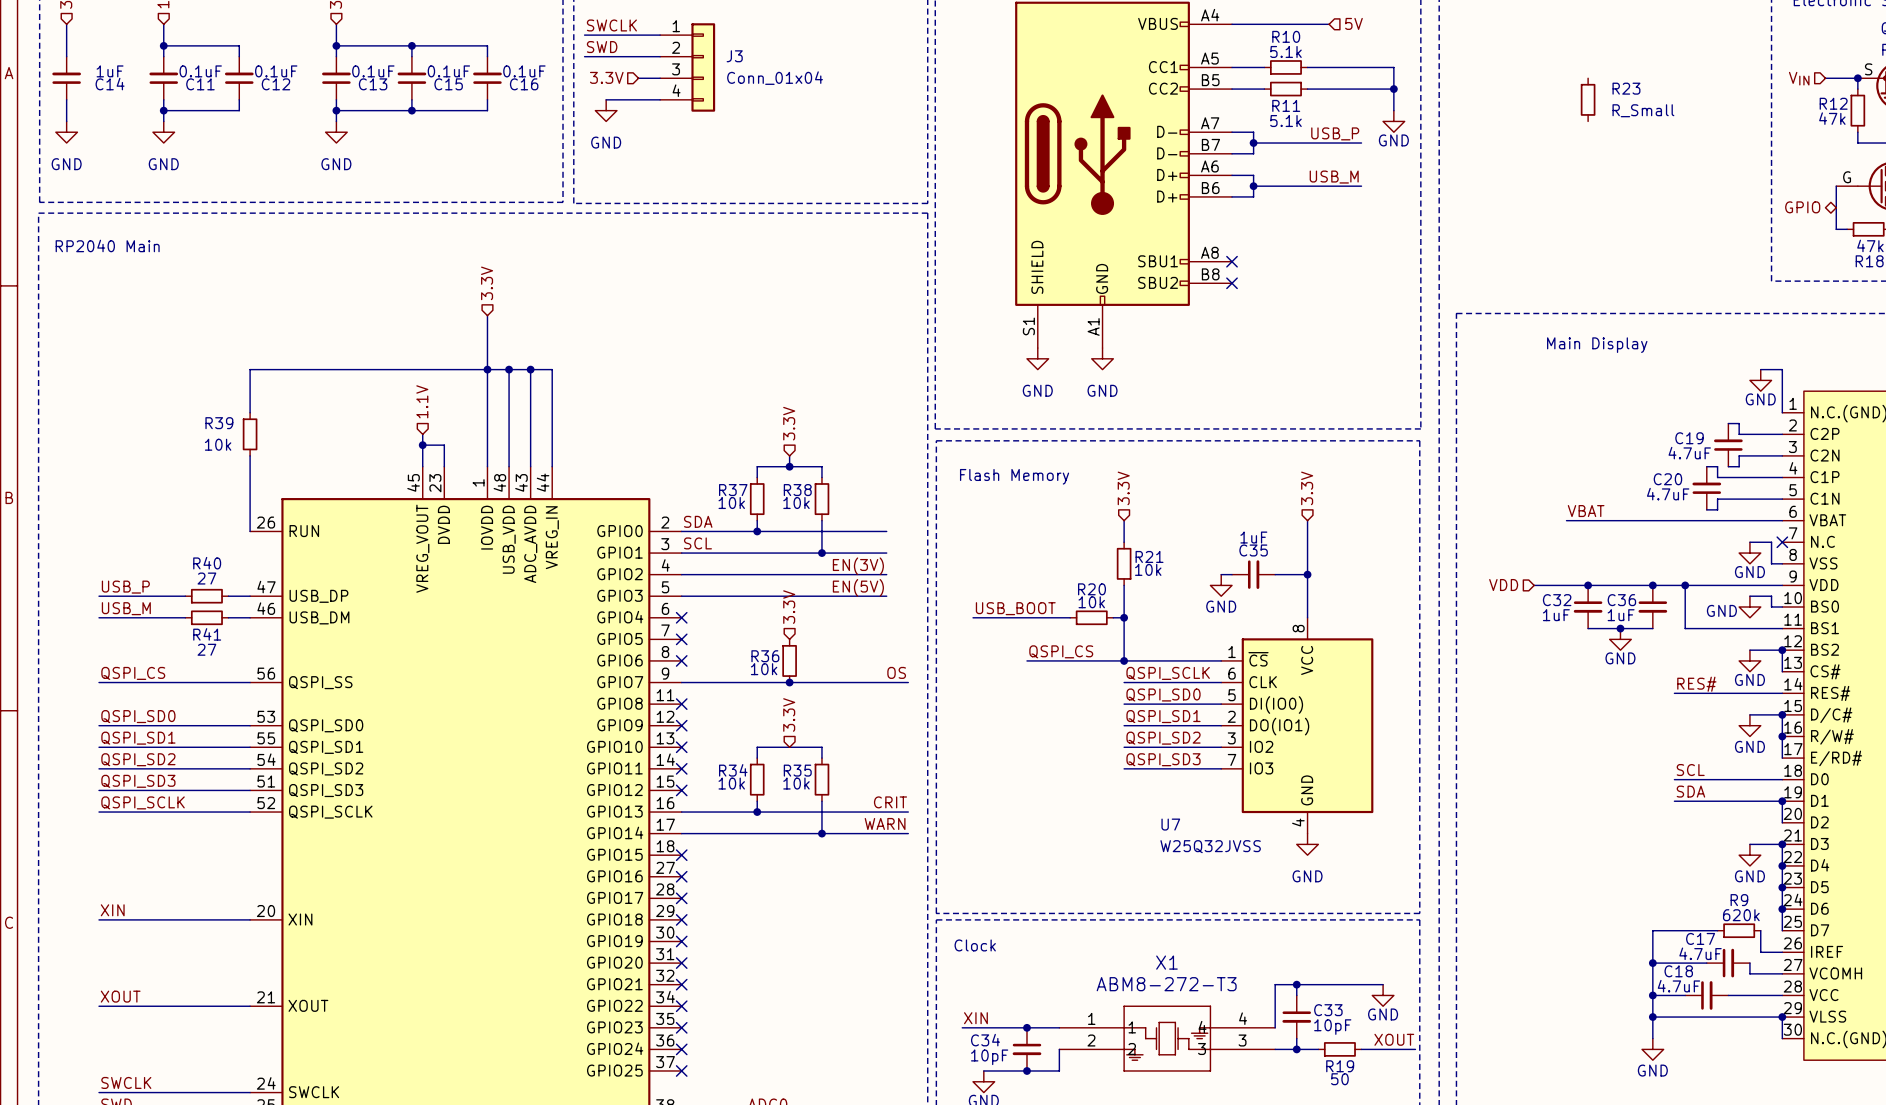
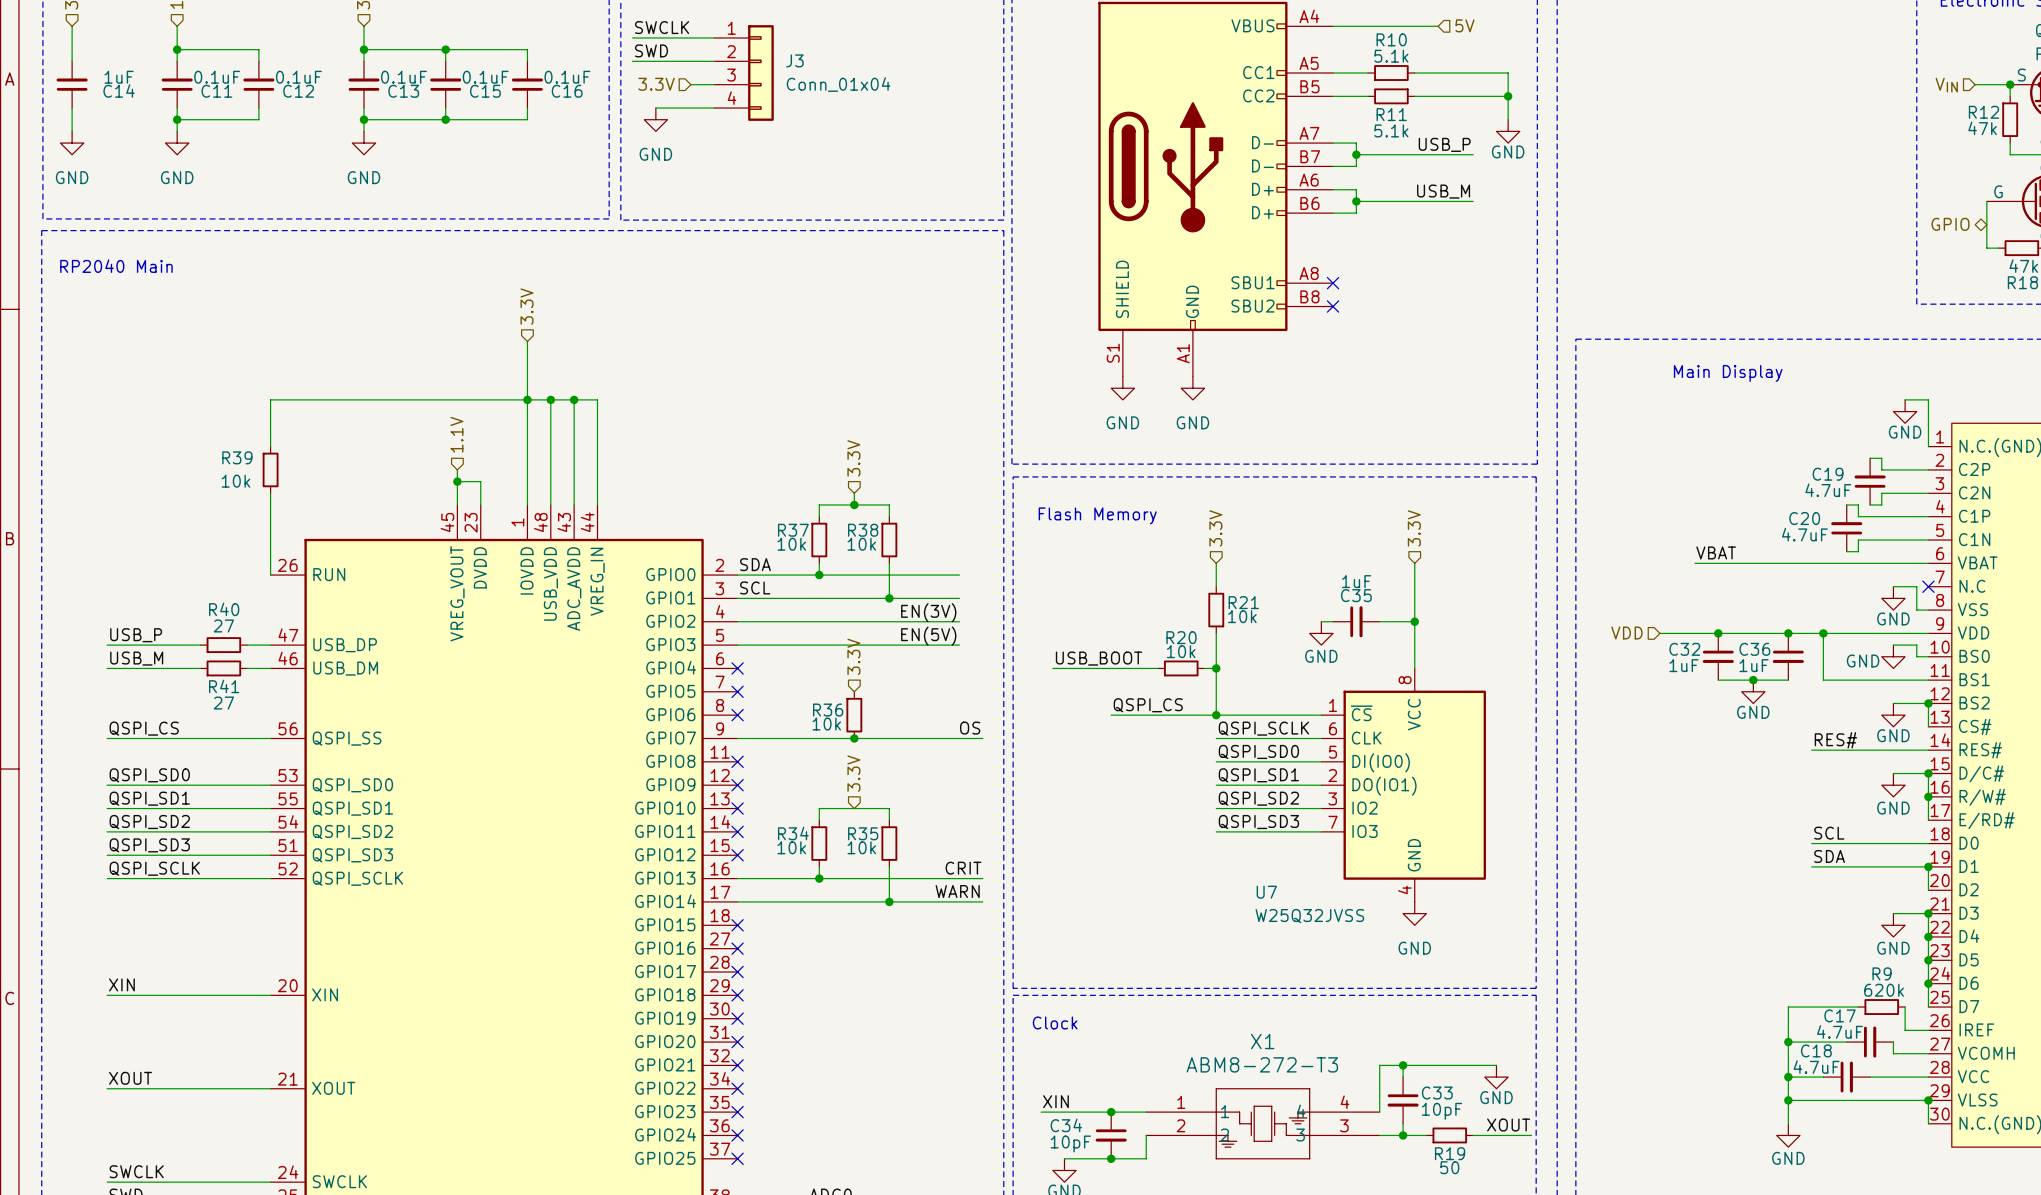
R23: R_Small (1588, 99) -> none

